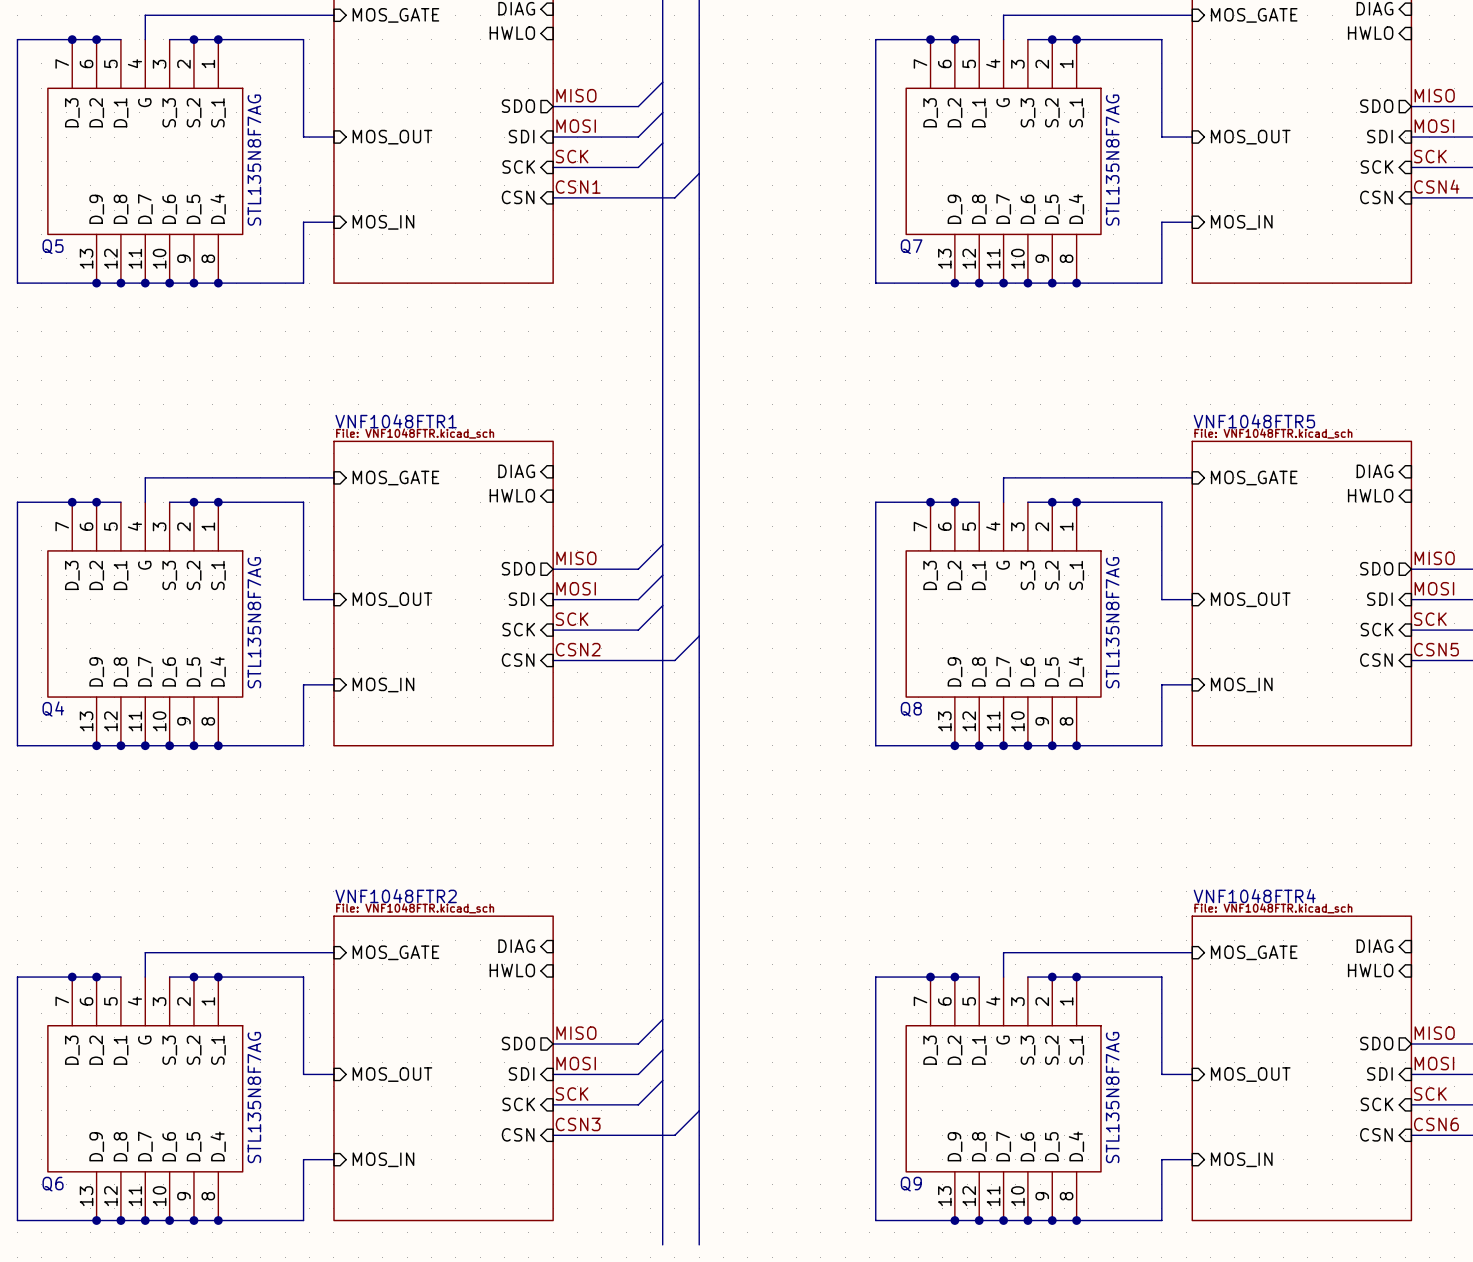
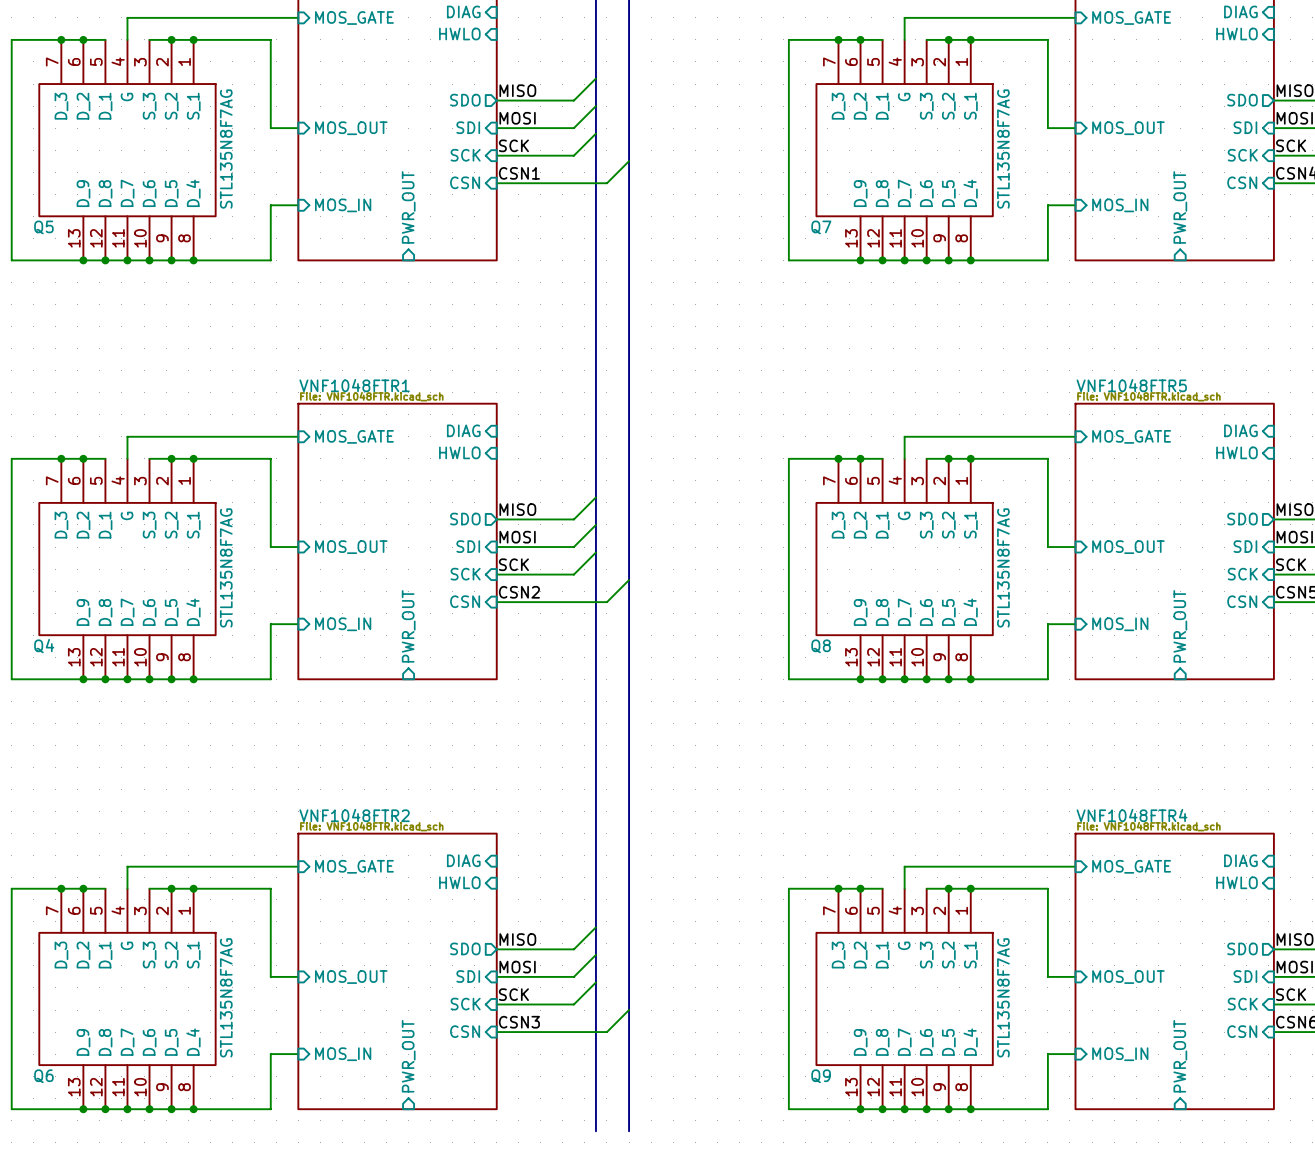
sheet pin: none -> PWR_OUT (408, 207)
sheet pin: none -> PWR_OUT (1180, 207)
sheet pin: none -> PWR_OUT (408, 626)
sheet pin: none -> PWR_OUT (1180, 626)
sheet pin: none -> PWR_OUT (408, 1056)
sheet pin: none -> PWR_OUT (1180, 1056)

